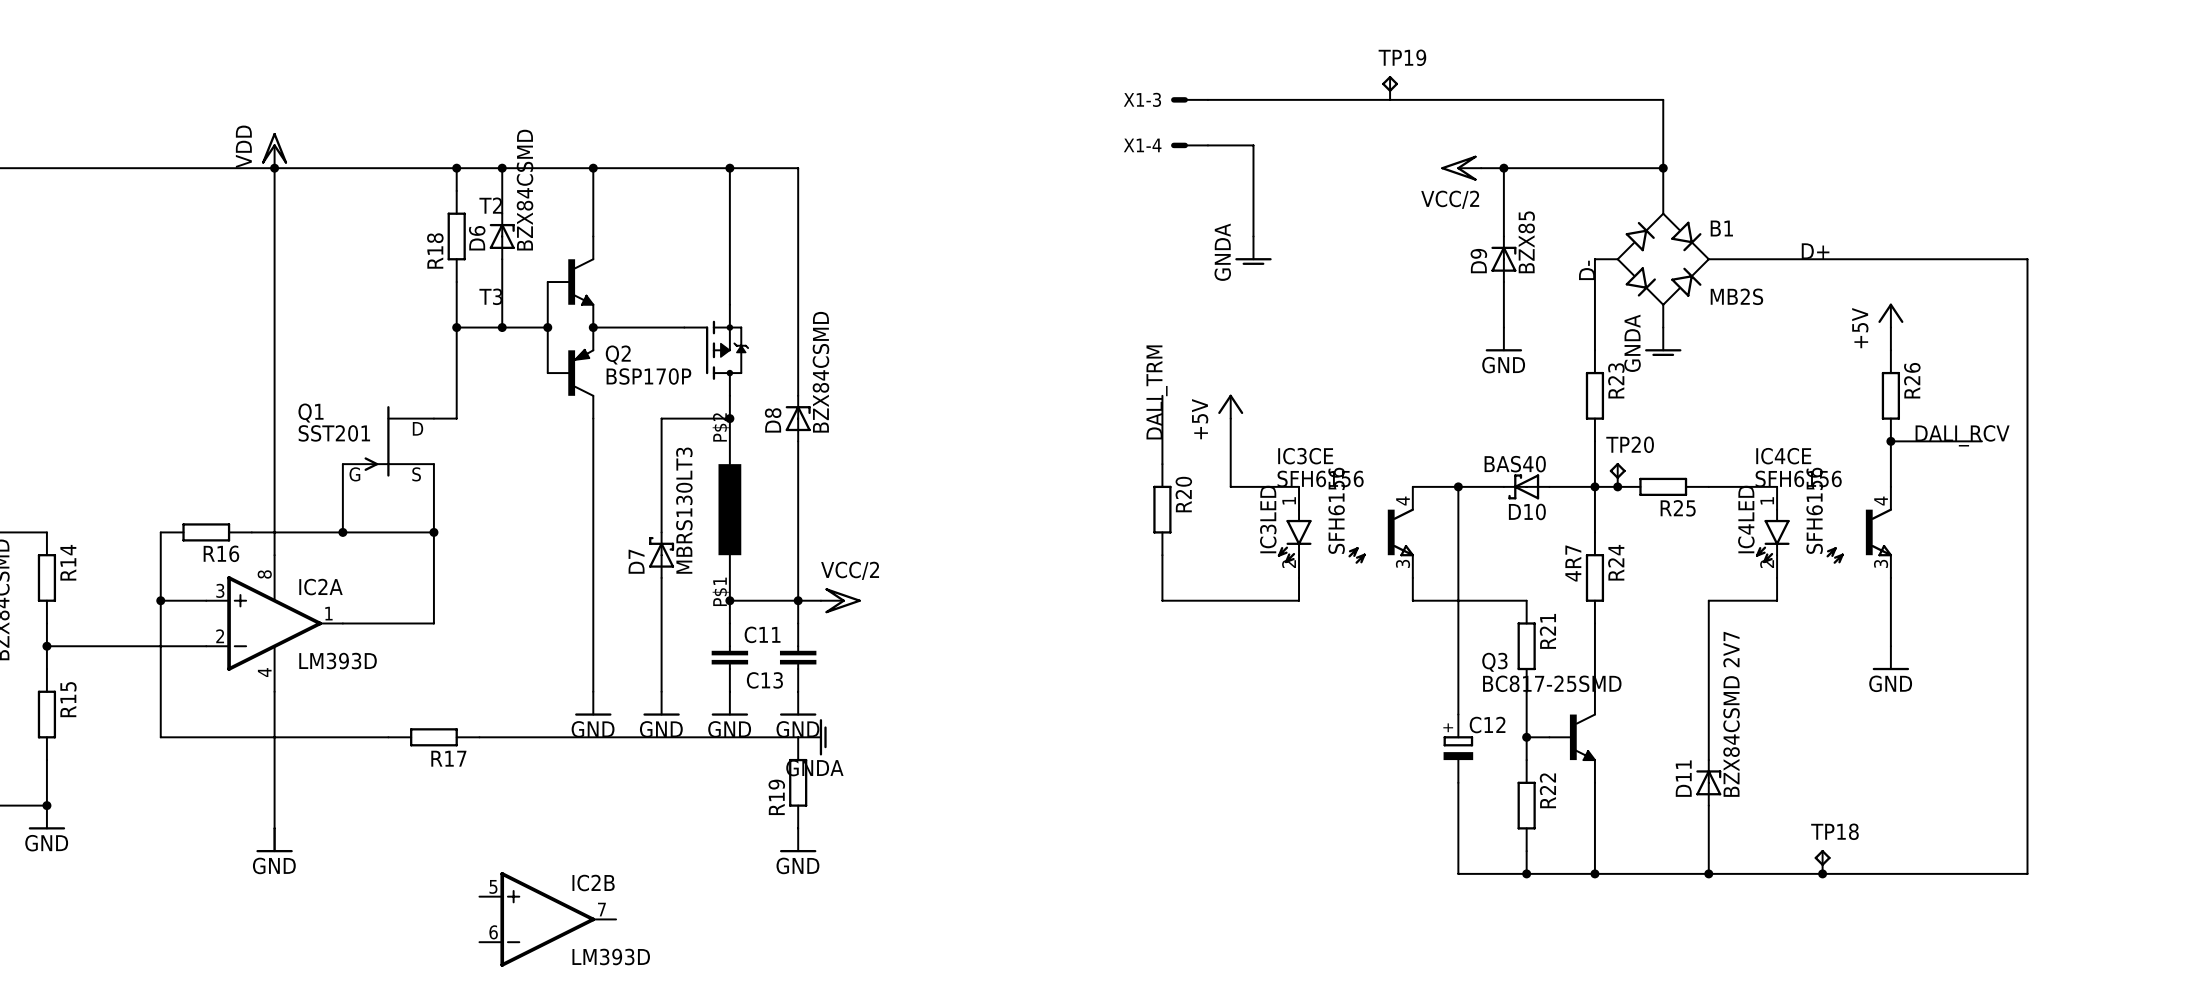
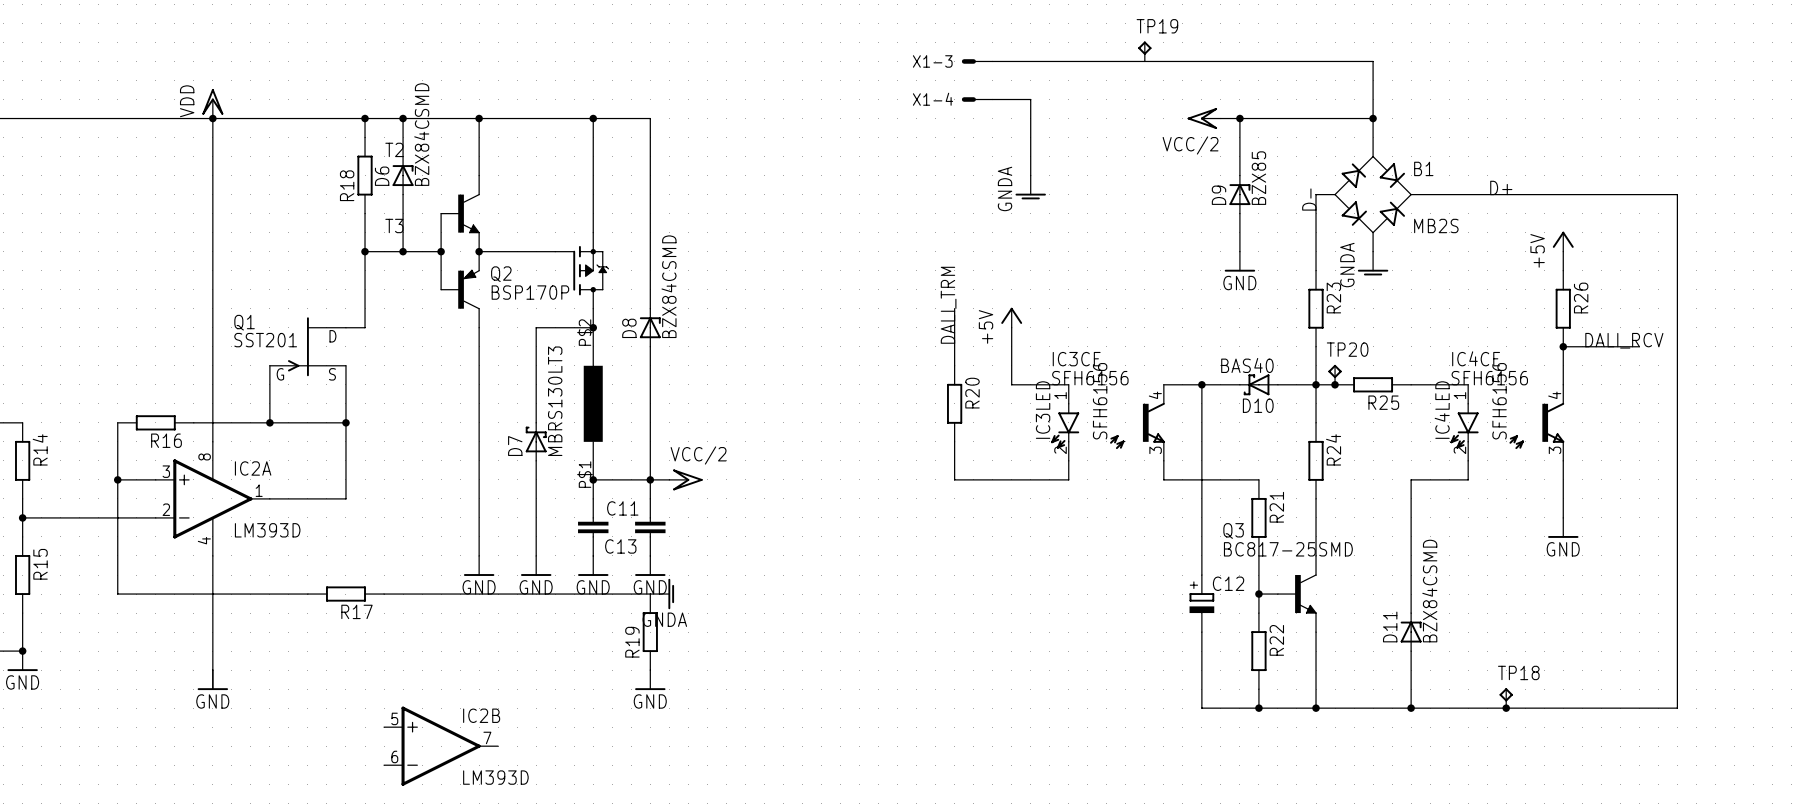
R24 value: 4R7 (1573, 563) -> none
D11 value: BZX84CSMD 2V7 (1731, 714) -> BZX84CSMD (1429, 591)

